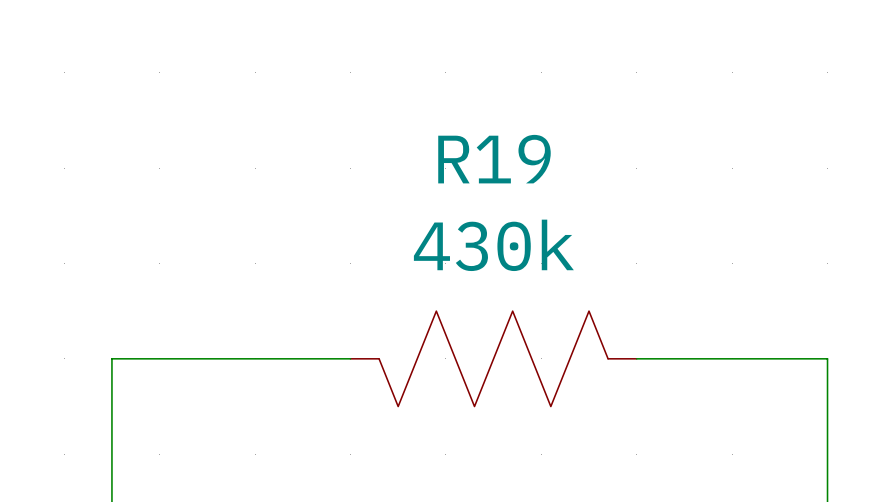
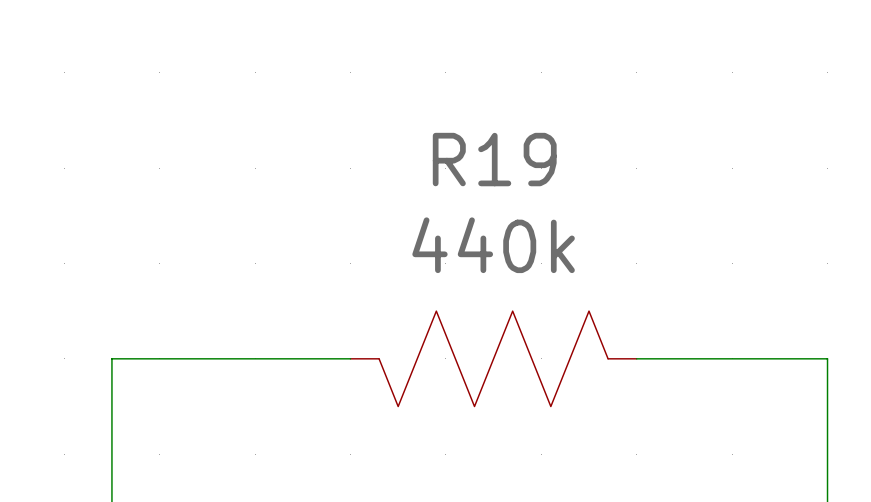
R19 value: 430k (493, 245) -> 440k (493, 245)

